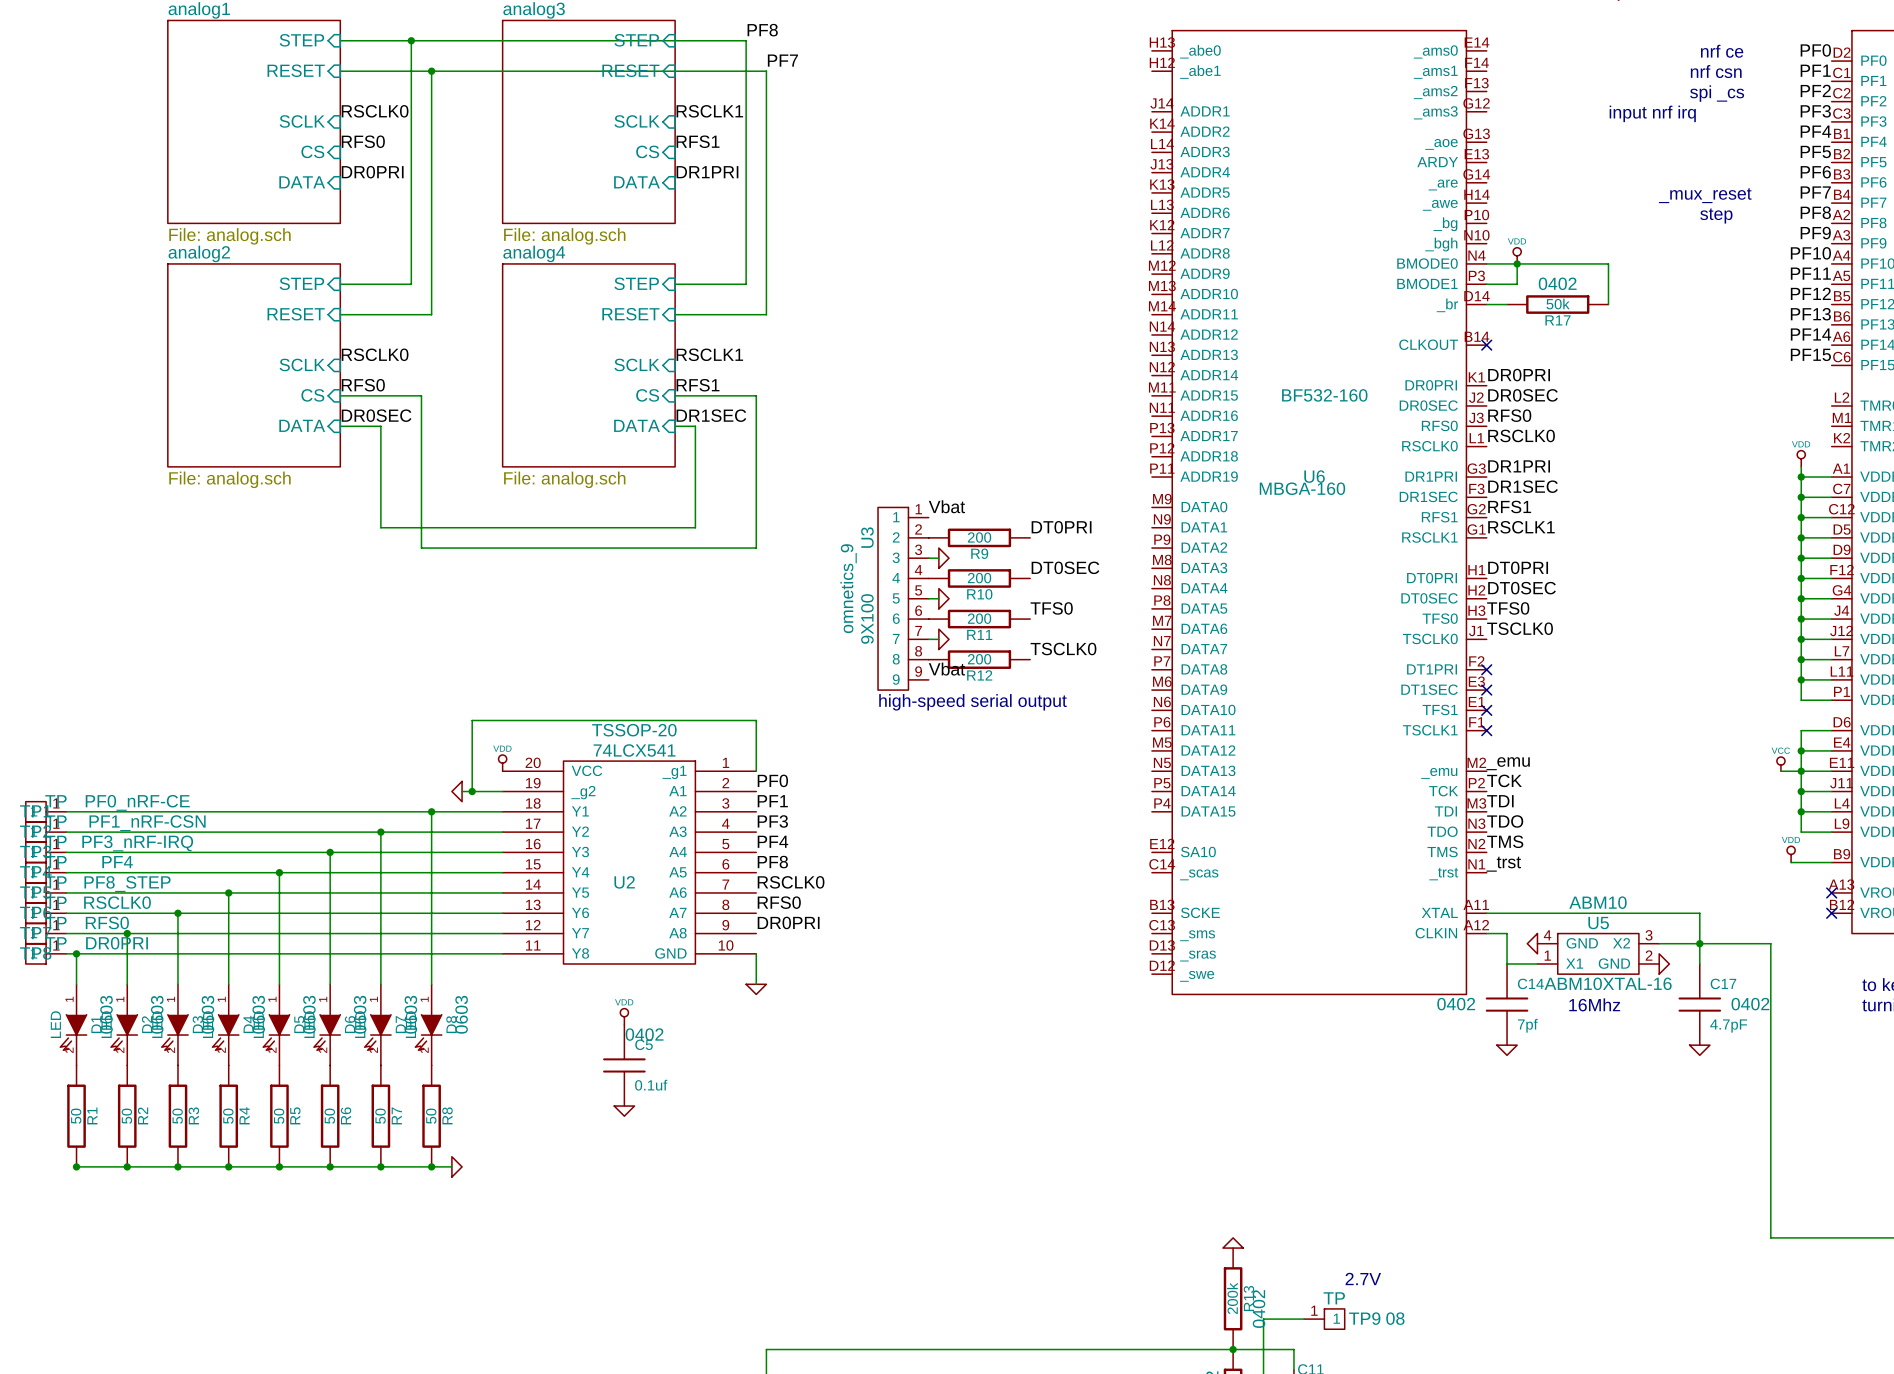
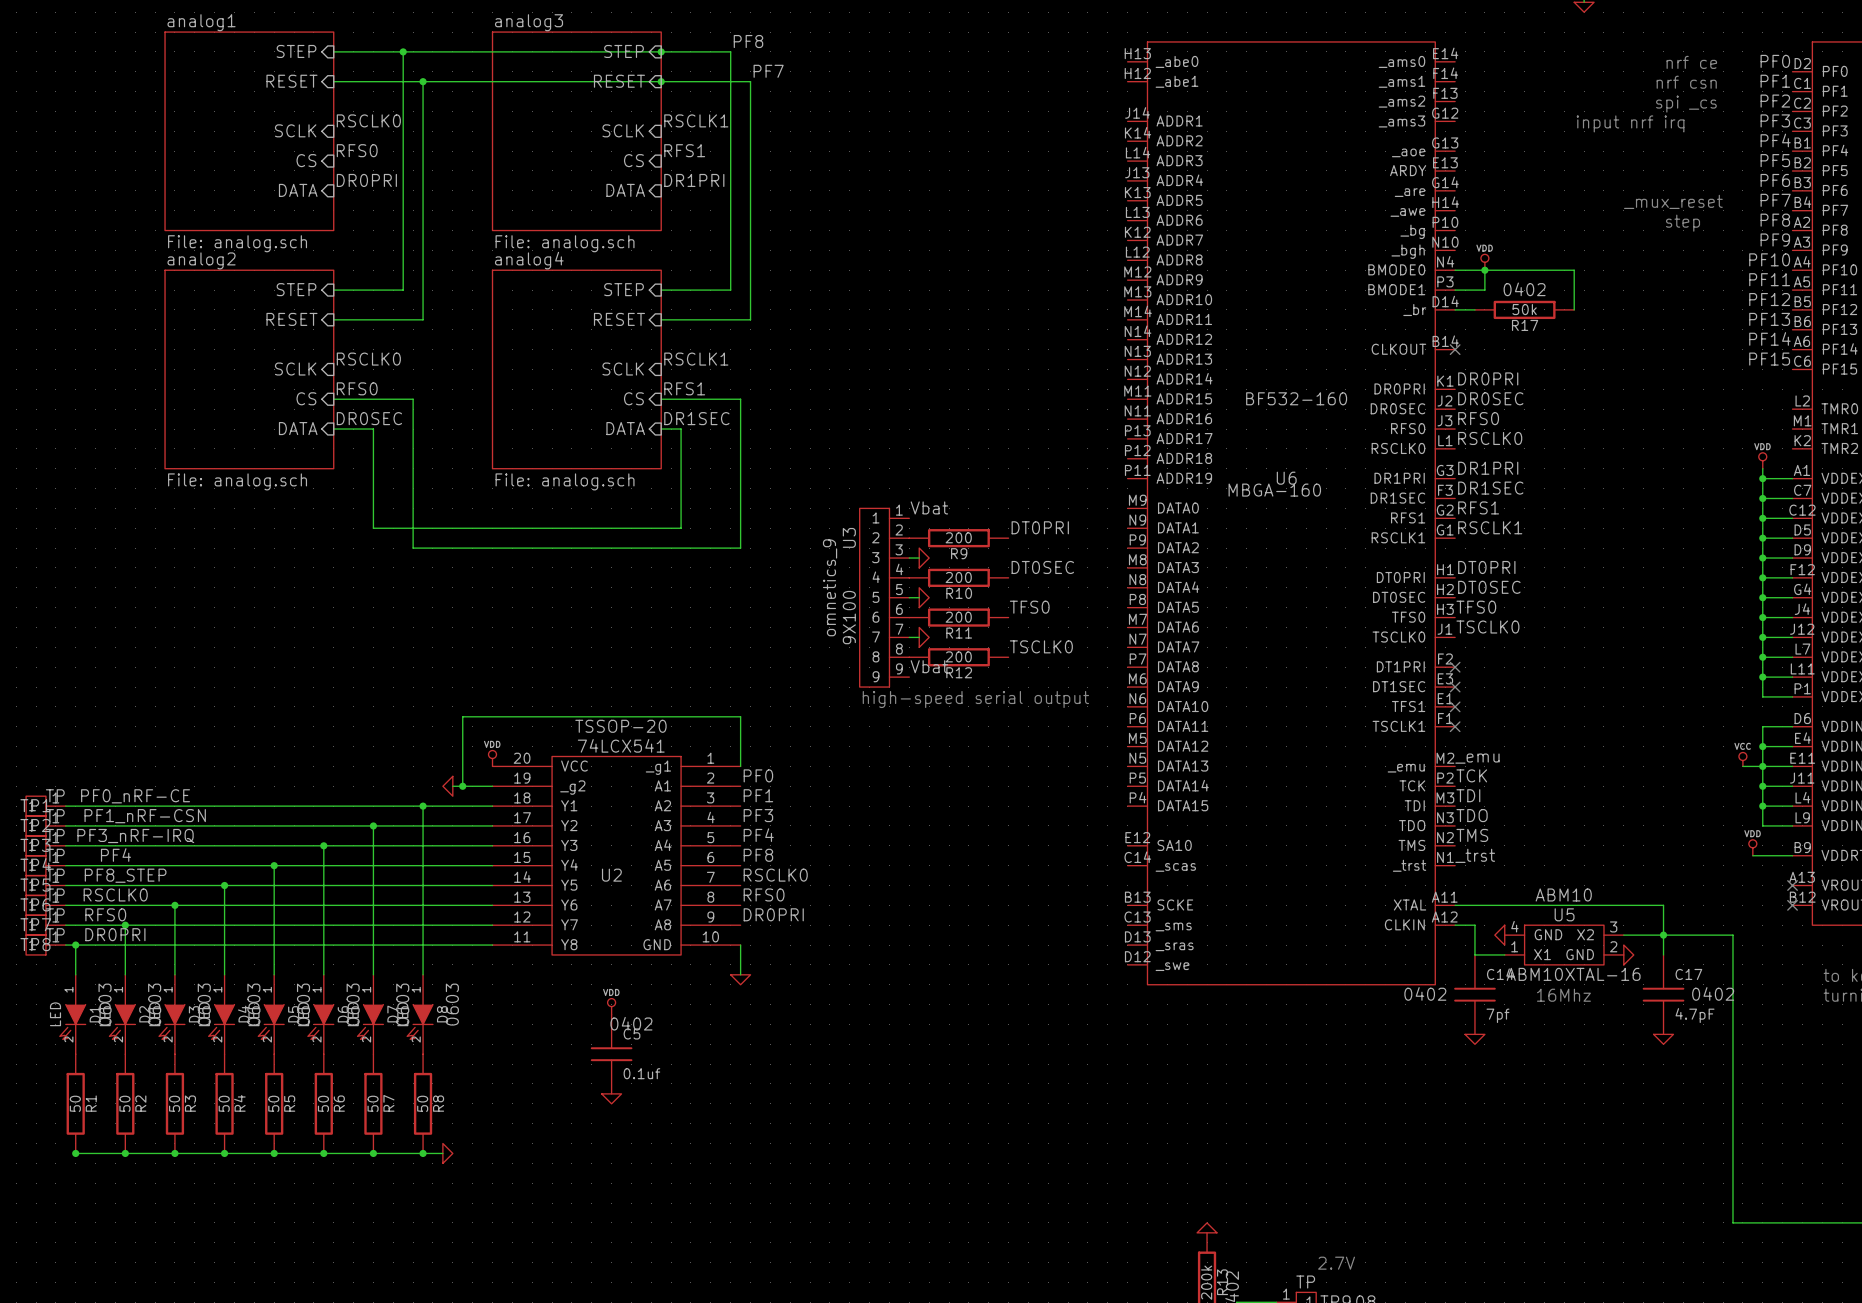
junction: none -> (661, 51)
junction: none -> (661, 81)

